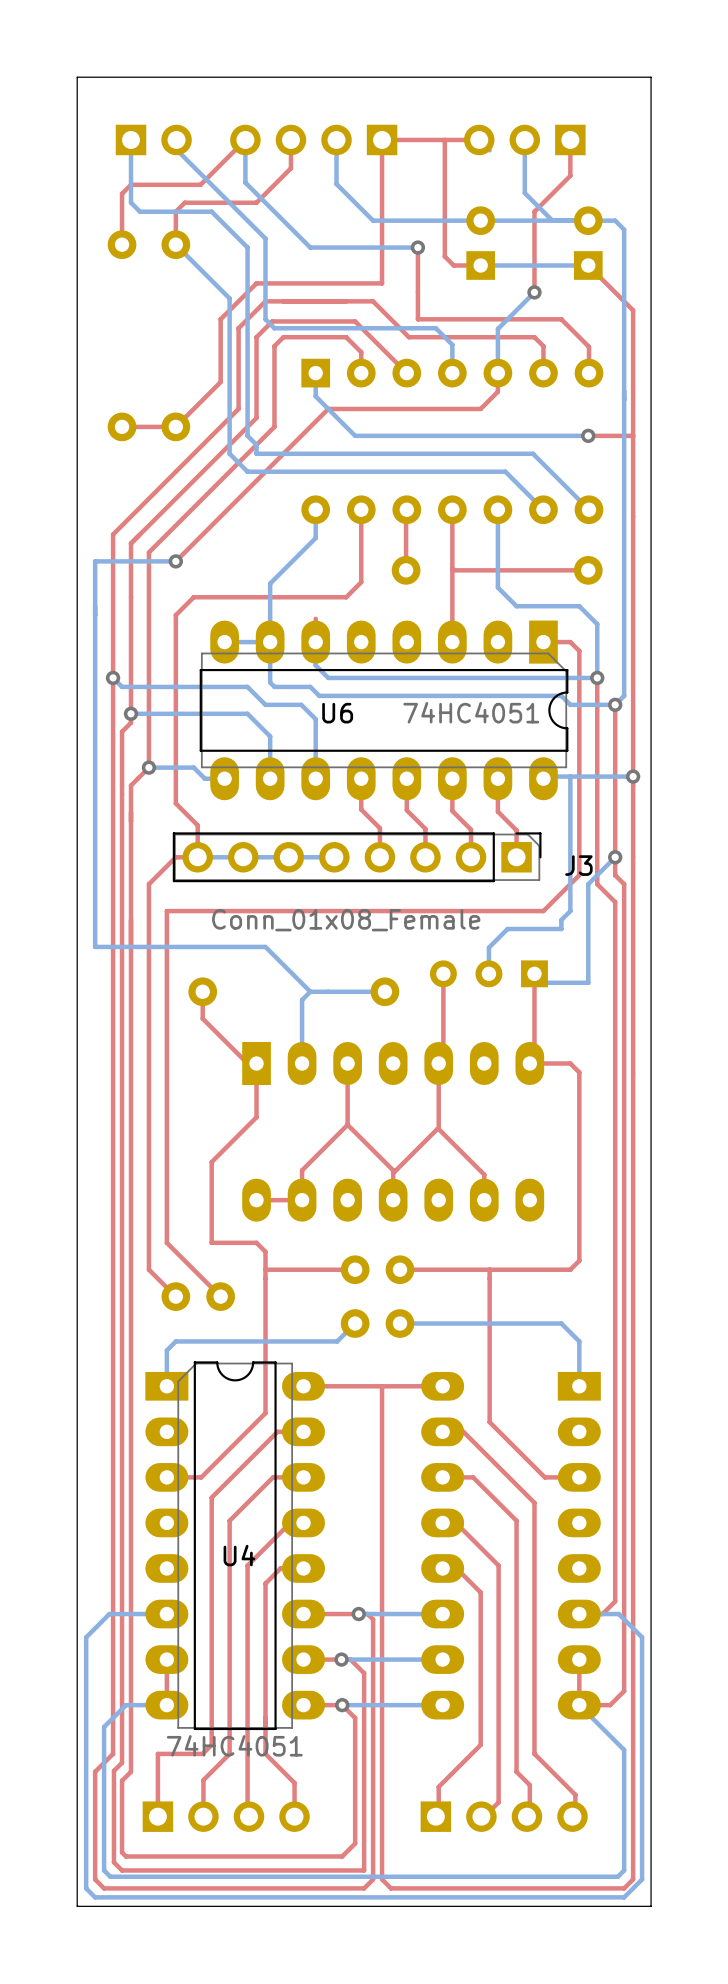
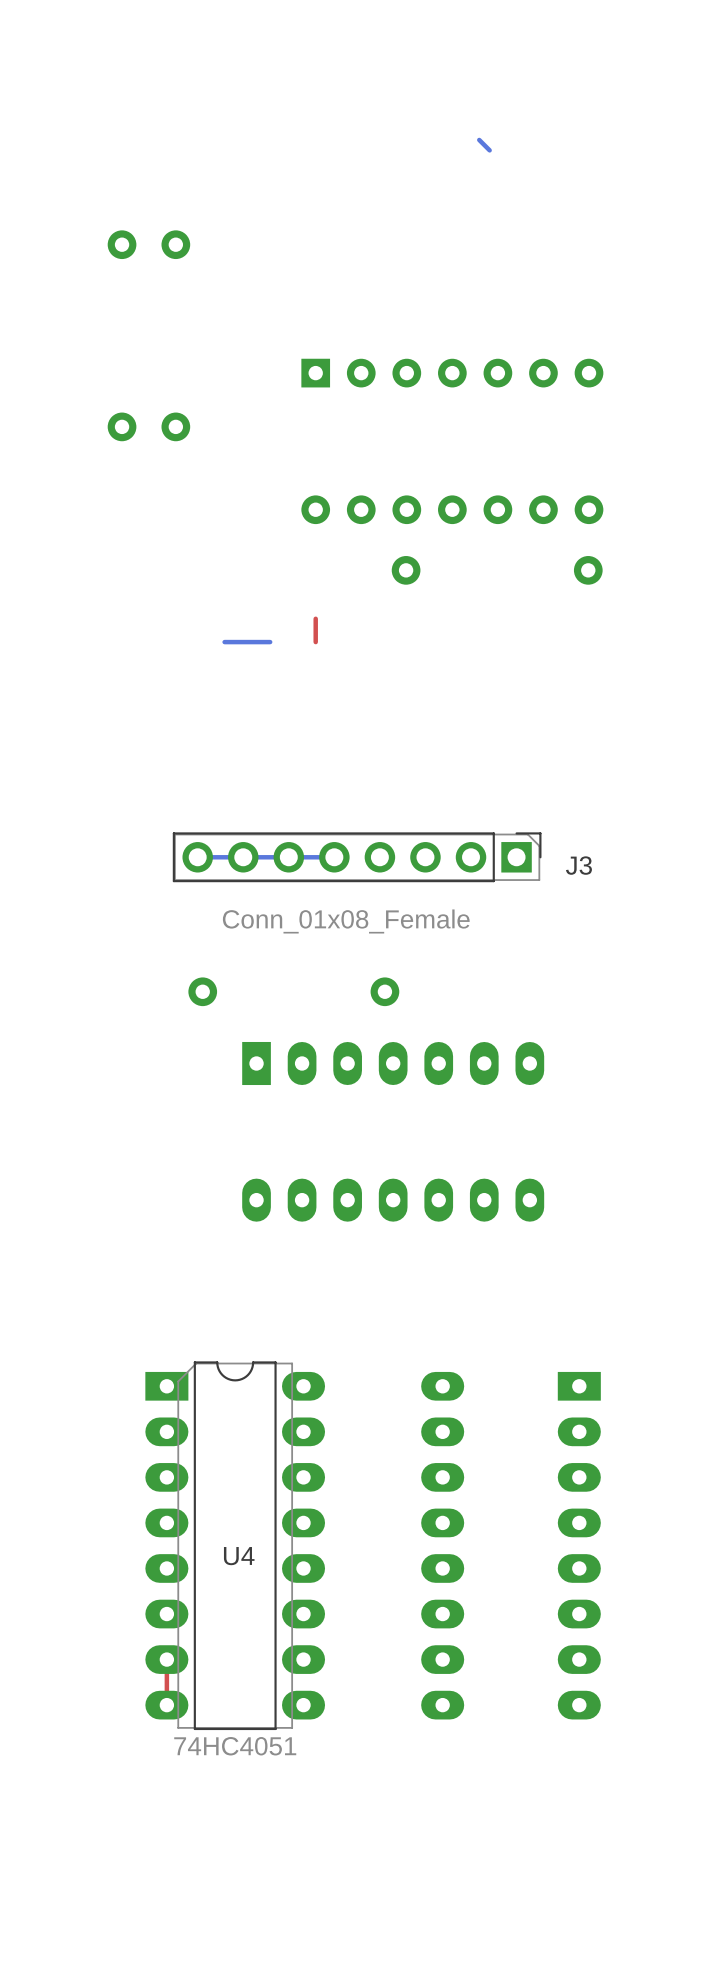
board edge: (651, 77) (651, 1906) (77, 1906) (77, 77) (651, 77) -> none
bottom track: (131, 139) (131, 202) (139, 211) (211, 211) (247, 247) (247, 435) (256, 444) (256, 453) (533, 453) (589, 509) -> none
part: (153, 139) -> none
bottom track: (176, 139) (176, 149) (265, 238) (265, 319) (274, 328) (435, 328) (452, 344) (452, 373) -> none
bottom track: (245, 139) (245, 182) (310, 247) (417, 247) -> none
top track: (245, 139) (200, 184) (131, 184) (122, 193) (122, 244) -> none
part: (313, 139) -> none
bottom track: (336, 139) (336, 184) (373, 220) (615, 220) (624, 229) (624, 695) (615, 704) (570, 704) (561, 695) (319, 695) (310, 686) (274, 686) (270, 682) (270, 583) (315, 538) (315, 509) -> none
top track: (444, 139) (444, 256) (453, 265) (480, 265) -> none
top track: (479, 139) (382, 139) (382, 283) (256, 283) (220, 319) (220, 382) (175, 426) (122, 426) -> none
part: (524, 139) -> none
top track: (570, 139) (570, 175) (534, 211) (534, 292) -> none
bottom track: (525, 140) (524, 193) (552, 220) -> none
top track: (292, 141) (290, 139) (290, 168) (256, 202) (184, 202) (175, 211) (175, 244) -> none
part: (480, 243) -> none
part: (588, 243) -> none
bottom track: (175, 244) (229, 298) (229, 453) (247, 471) (505, 471) (543, 509) -> none
top track: (417, 247) (417, 319) (561, 319) (589, 346) (589, 373) -> none
via: (417, 247) -> none
bottom track: (588, 265) (480, 265) -> none
top track: (588, 265) (633, 310) (633, 1879) (624, 1888) (391, 1888) (382, 1879) (382, 1386) -> none
bottom track: (534, 292) (497, 328) (497, 373) -> none
via: (534, 292) -> none
bottom track: (315, 373) (315, 396) (355, 435) (588, 435) -> none
top track: (361, 373) (361, 352) (346, 337) (283, 337) (274, 346) (274, 426) (148, 552) (148, 767) (131, 785) (131, 1771) (122, 1780) (122, 1852) (125, 1856) (342, 1856) (355, 1843) (355, 1718) (342, 1705) (303, 1705) -> none
top track: (406, 373) (355, 321) (272, 321) (256, 337) (256, 417) (131, 543) (131, 722) (122, 731) (122, 1762) (113, 1770) (113, 1862) (122, 1870) (364, 1870) (364, 1673) (350, 1659) (303, 1659) -> none
top track: (497, 373) (497, 391) (480, 408) (328, 408) (175, 561) -> none
top track: (543, 373) (543, 346) (534, 337) (408, 337) (373, 301) (265, 301) (238, 328) (238, 408) (113, 534) (113, 1753) (95, 1771) (95, 1879) (104, 1888) (364, 1888) (373, 1879) (373, 1619) (367, 1614) (303, 1614) -> none
via: (588, 435) -> none
top track: (633, 435) (588, 435) -> none
top track: (361, 509) (361, 582) (346, 597) (193, 597) (175, 615) (175, 803) (197, 825) (197, 857) (175, 857) (148, 884) (148, 1269) (175, 1296) -> none
top track: (406, 509) (406, 570) -> none
top track: (452, 509) (452, 642) -> none
bottom track: (497, 509) (497, 587) (516, 606) (579, 606) (597, 624) (597, 677) (328, 677) (315, 665) (315, 642) -> none
bottom track: (175, 561) (95, 561) (95, 946) (265, 946) (310, 991) -> none
via: (175, 561) -> none
top track: (452, 568) (588, 570) -> none
top track: (543, 642) (570, 642) (579, 651) (579, 875) (543, 911) (166, 911) (166, 1242) (220, 1296) -> none
bottom track: (113, 677) (122, 686) (247, 686) (265, 704) (301, 704) (315, 719) (315, 778) -> none
via: (113, 677) -> none
top track: (597, 677) (597, 884) (615, 902) (615, 1601) (602, 1614) (579, 1614) -> none
via: (597, 677) -> none
top track: (615, 704) (615, 875) (624, 884) (624, 1691) (610, 1705) (579, 1705) (579, 1659) -> none
via: (615, 704) -> none
U6: 74HC4051 (384, 710) -> none
bottom track: (131, 713) (247, 713) (270, 736) (270, 778) -> none
via: (131, 713) -> none
bottom track: (148, 767) (193, 767) (204, 778) (224, 778) -> none
via: (148, 767) -> none
bottom track: (570, 776) (570, 911) (561, 920) (561, 929) (507, 929) (488, 947) (488, 973) -> none
bottom track: (633, 776) (545, 776) (543, 778) -> none
via: (633, 776) -> none
top track: (497, 778) (497, 811) (516, 830) (515, 856) -> none
top track: (361, 779) (361, 809) (379, 828) (379, 857) -> none
top track: (407, 779) (406, 810) (425, 828) (425, 857) -> none
top track: (453, 779) (452, 811) (471, 829) (471, 857) -> none
bottom track: (615, 857) (588, 884) (588, 982) (543, 982) (534, 973) -> none
via: (615, 857) -> none
top track: (443, 973) (443, 1058) (438, 1063) (438, 1129) -> none
part: (488, 973) -> none
top track: (534, 973) (534, 1058) (529, 1063) (570, 1063) (579, 1072) (579, 1260) (570, 1269) (399, 1269) -> none
top track: (202, 991) (202, 1018) (247, 1063) (256, 1063) (256, 1117) (211, 1162) (211, 1242) (256, 1242) (265, 1251) (265, 1413) (201, 1477) (166, 1477) -> none
bottom track: (310, 991) (302, 1000) (302, 1063) -> none
bottom track: (384, 991) (310, 991) -> none
top track: (347, 1063) (347, 1124) -> none
top track: (347, 1124) (302, 1170) (302, 1200) (256, 1200) -> none
top track: (347, 1124) (393, 1170) (393, 1200) -> none
top track: (438, 1129) (484, 1174) (484, 1200) -> none
top track: (438, 1129) (393, 1173) -> none
top track: (355, 1269) (265, 1269) -> none
part: (377, 1269) -> none
top track: (489, 1269) (489, 1422) (544, 1477) (579, 1477) -> none
part: (198, 1296) -> none
bottom track: (355, 1323) (337, 1341) (175, 1341) (166, 1350) (166, 1386) -> none
part: (377, 1323) -> none
bottom track: (399, 1323) (561, 1323) (579, 1341) (579, 1386) -> none
top track: (442, 1386) (303, 1386) -> none
top track: (303, 1431) (277, 1431) (211, 1497) (211, 1744) (202, 1753) (157, 1753) (157, 1816) -> none
top track: (442, 1431) (463, 1431) (534, 1502) (534, 1753) (575, 1794) (575, 1816) -> none
top track: (303, 1477) (273, 1477) (229, 1520) (229, 1753) (203, 1780) (203, 1816) -> none
top track: (442, 1477) (473, 1477) (516, 1520) (516, 1771) (529, 1785) (529, 1816) -> none
top track: (303, 1522) (290, 1522) (247, 1565) (247, 1815) (249, 1816) (256, 1809) -> none
top track: (442, 1522) (455, 1522) (498, 1565) (498, 1802) (484, 1816) -> none
top track: (303, 1568) (280, 1568) (265, 1583) (265, 1753) (294, 1782) (294, 1816) -> none
top track: (442, 1568) (456, 1568) (480, 1592) (480, 1744) (438, 1786) (438, 1816) -> none
via: (358, 1614) -> none
bottom track: (442, 1614) (358, 1614) -> none
bottom track: (579, 1614) (618, 1614) (642, 1637) (642, 1879) (624, 1897) (95, 1897) (86, 1888) (86, 1637) (109, 1614) (166, 1614) (166, 1619) -> none
via: (341, 1659) -> none
bottom track: (442, 1659) (341, 1659) -> none
via: (342, 1705) -> none
bottom track: (442, 1705) (342, 1705) -> none
bottom track: (579, 1705) (624, 1749) (624, 1870) (617, 1876) (110, 1876) (104, 1870) (104, 1727) (125, 1705) (166, 1705) -> none
part: (226, 1816) -> none
part: (504, 1816) -> none

